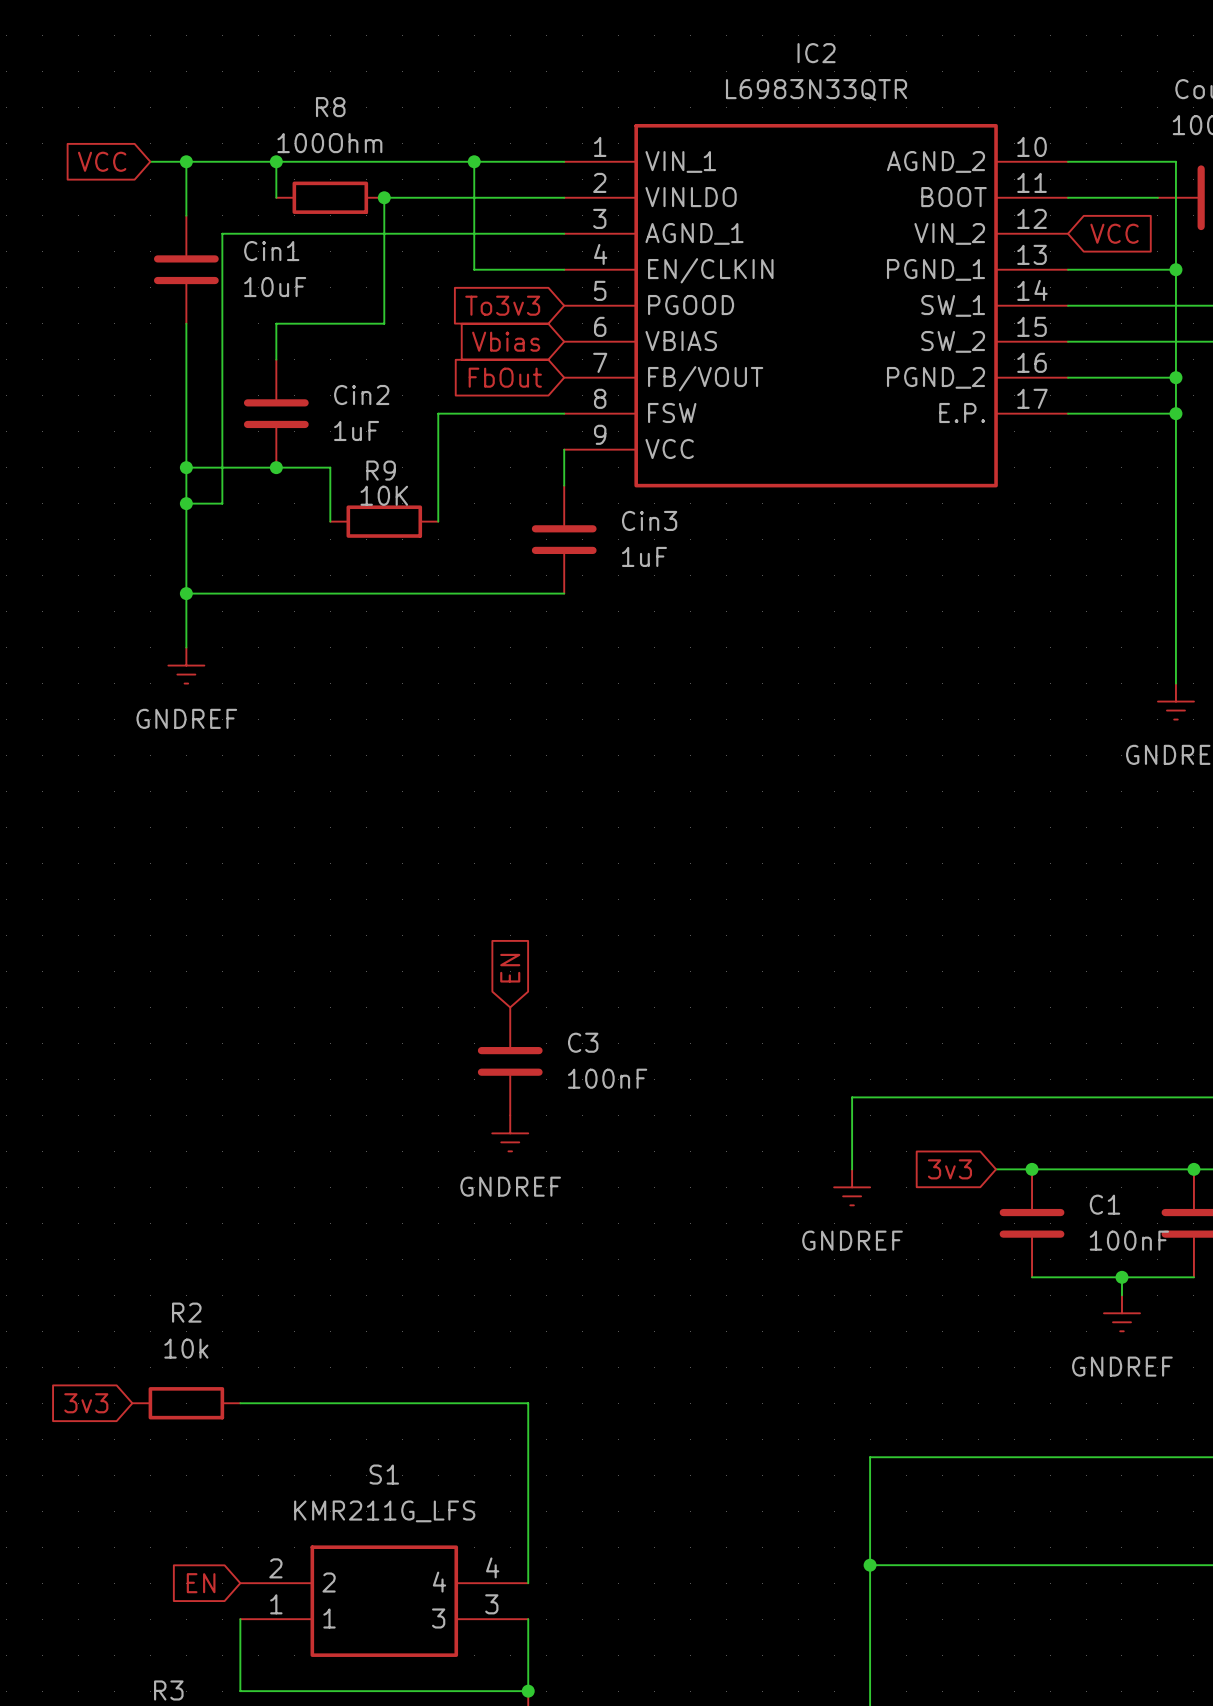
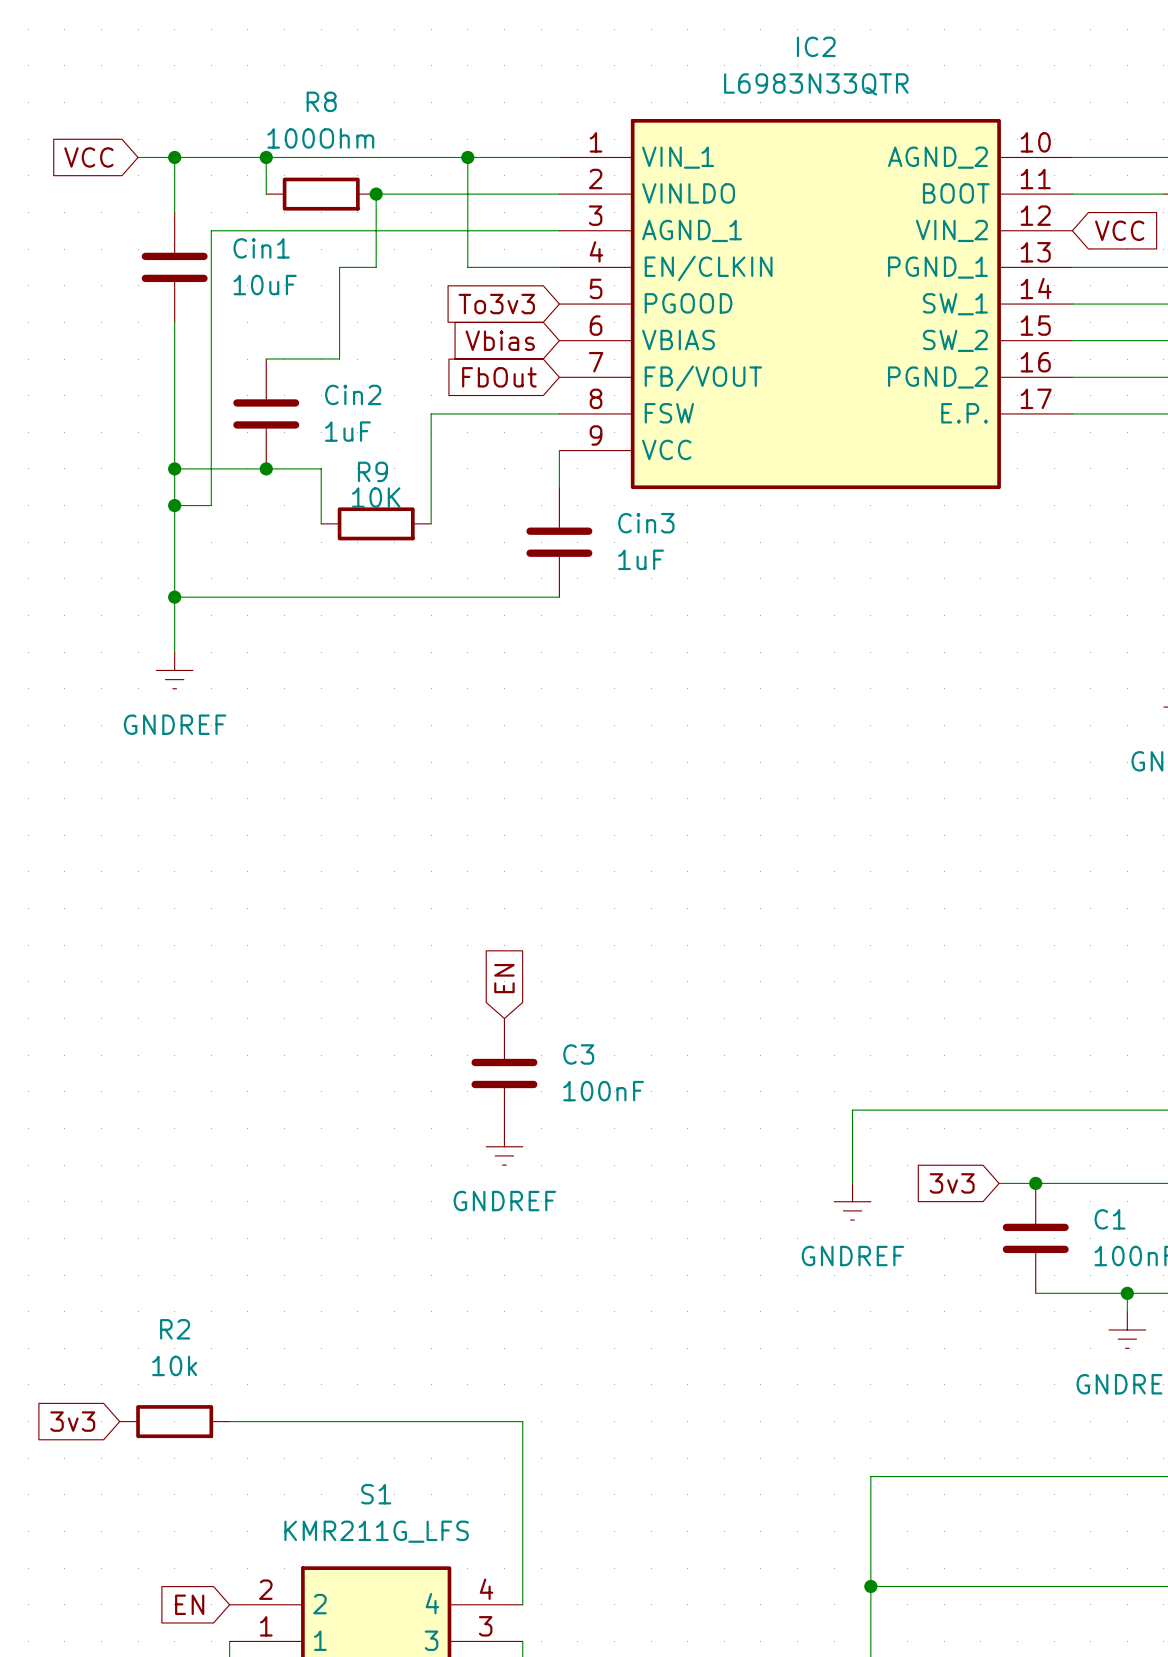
wire: (384, 269) (384, 323) (276, 323) (276, 359) -> (376, 267) (339, 267) (339, 359) (266, 359)

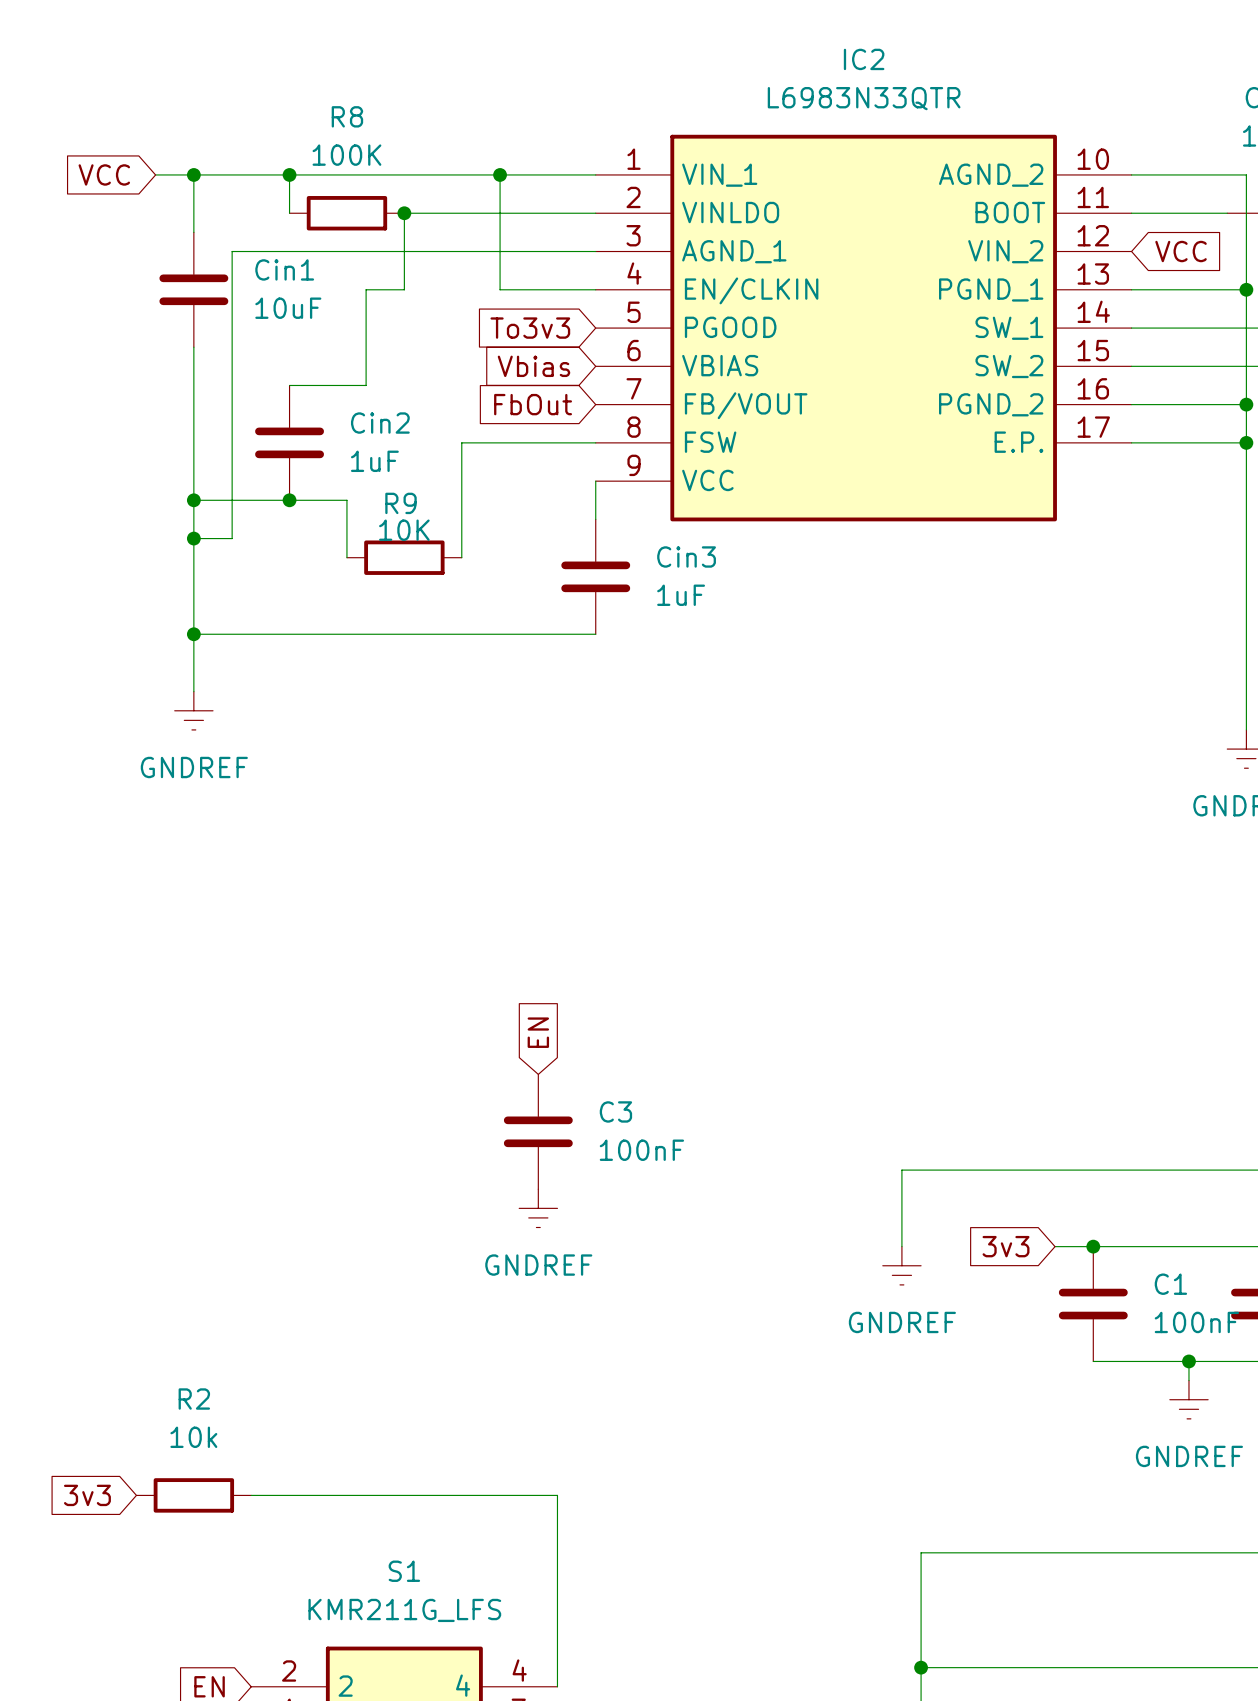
R8 value: 100Ohm (320, 138) -> 100K (346, 155)

